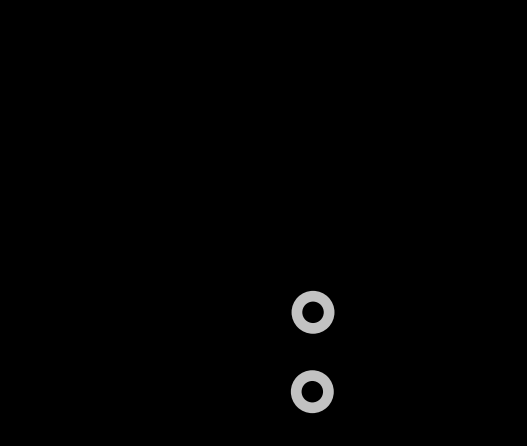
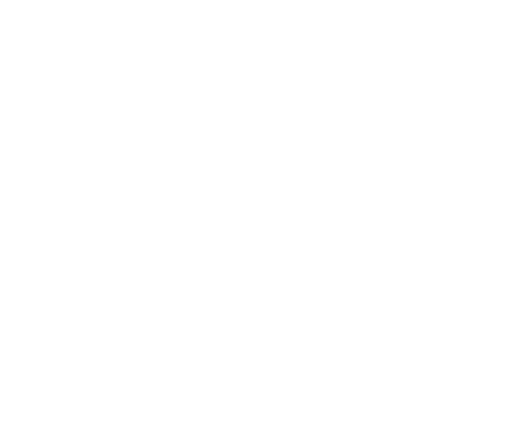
via: (313, 312) -> none
via: (312, 391) -> none

